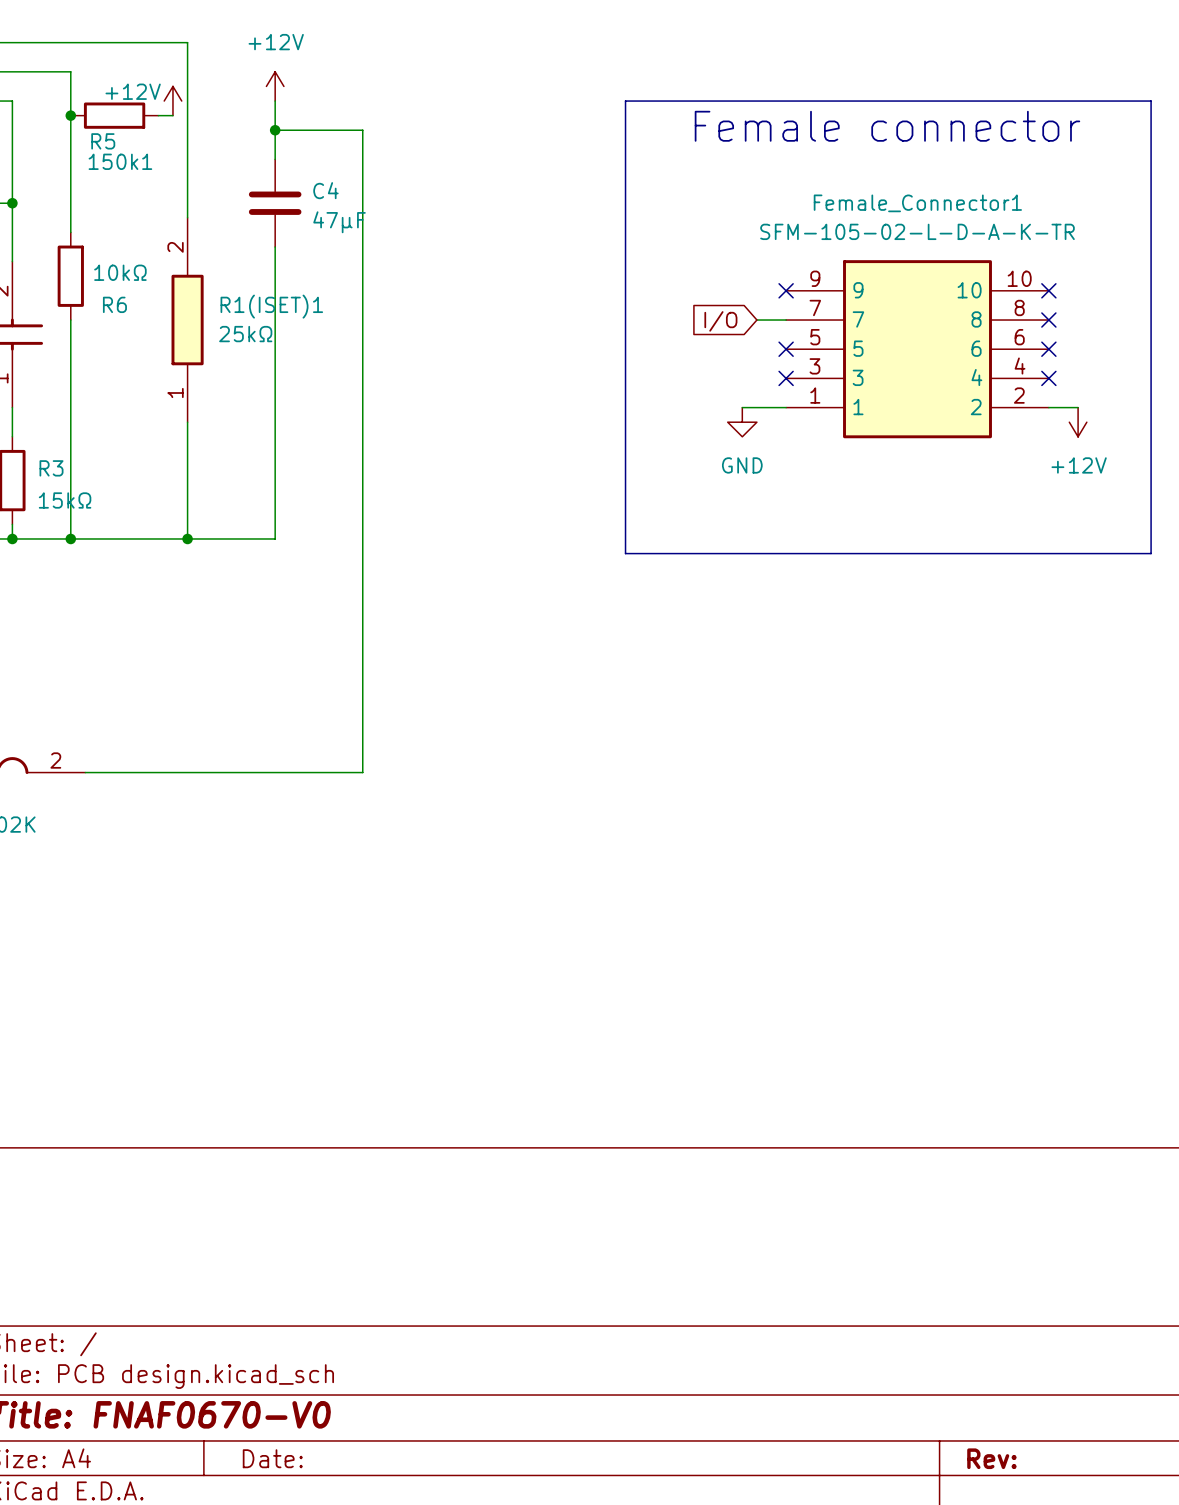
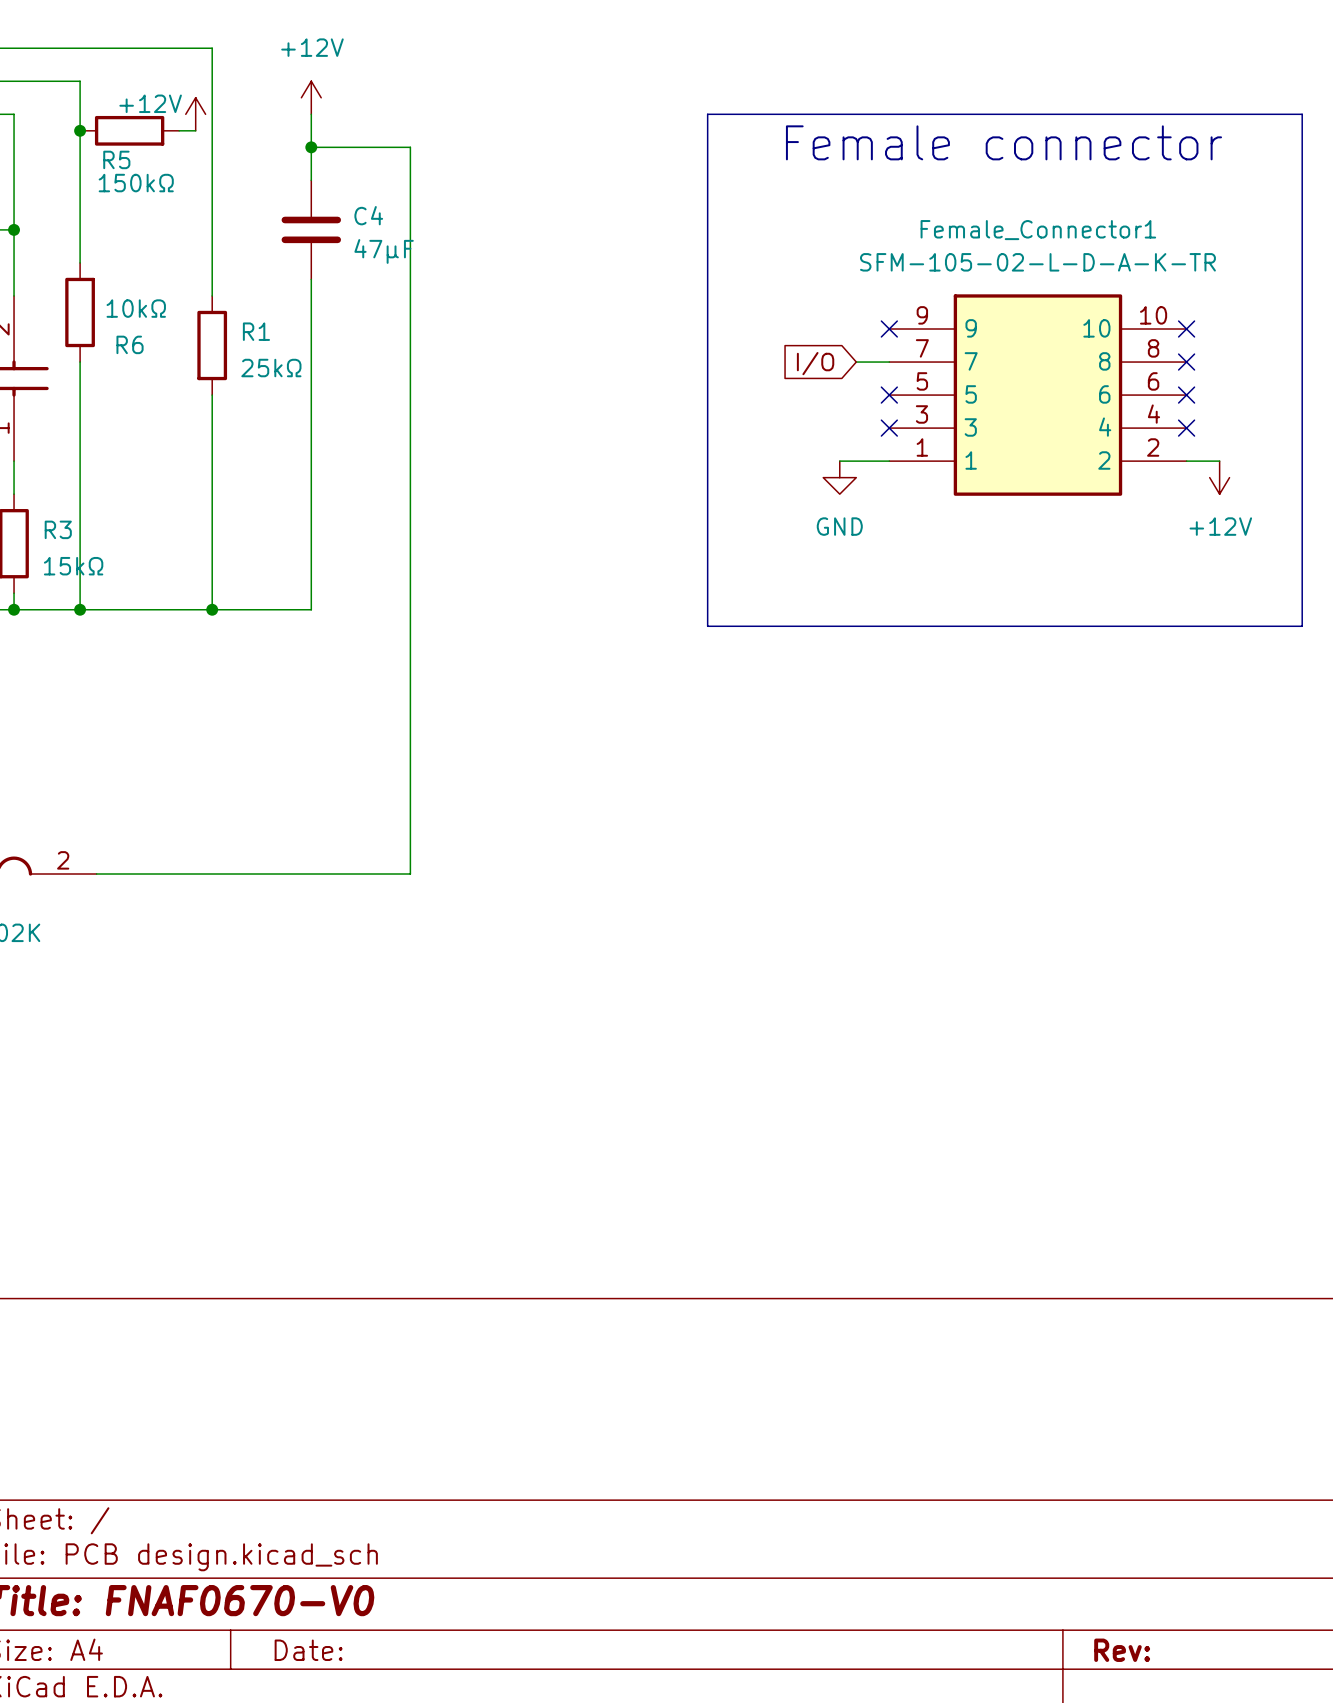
150k1 name: 150k1 (120, 161) -> 150kΩ (136, 183)
R1: none -> 25kΩ (212, 345)
R1(ISET)1: 25kΩ (187, 320) -> none

